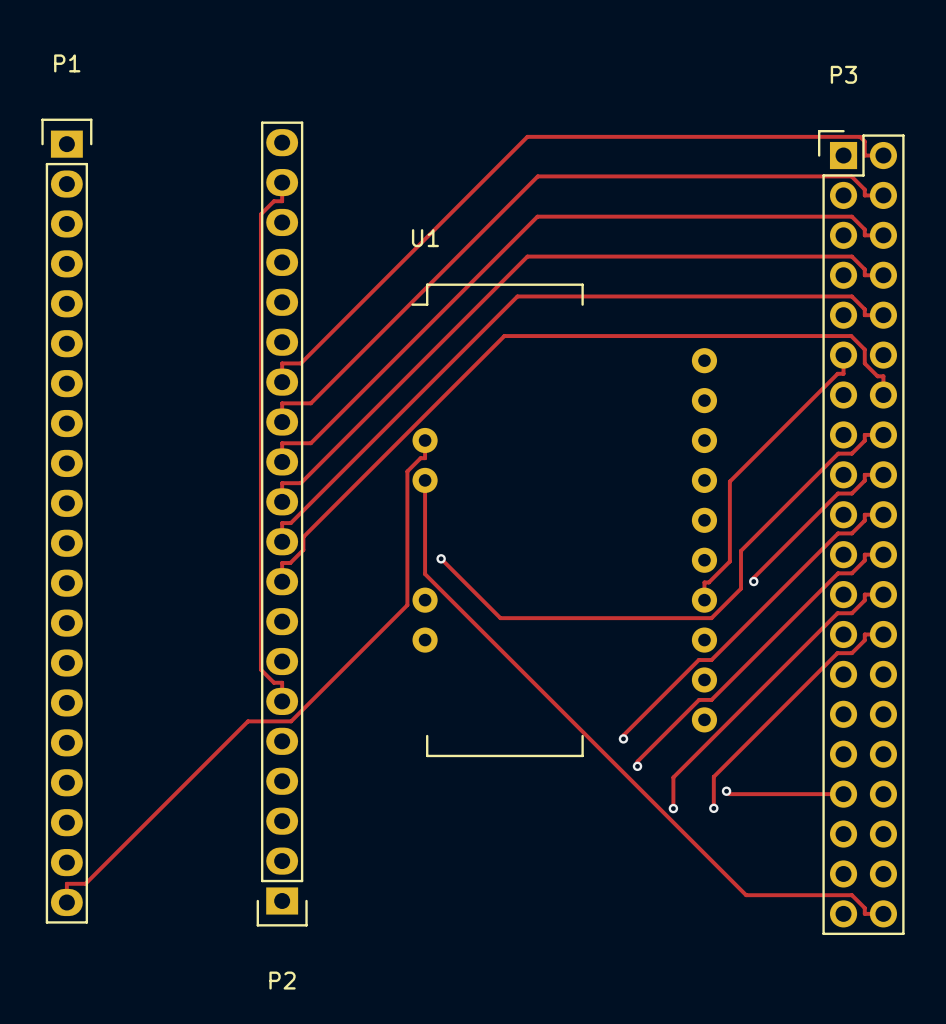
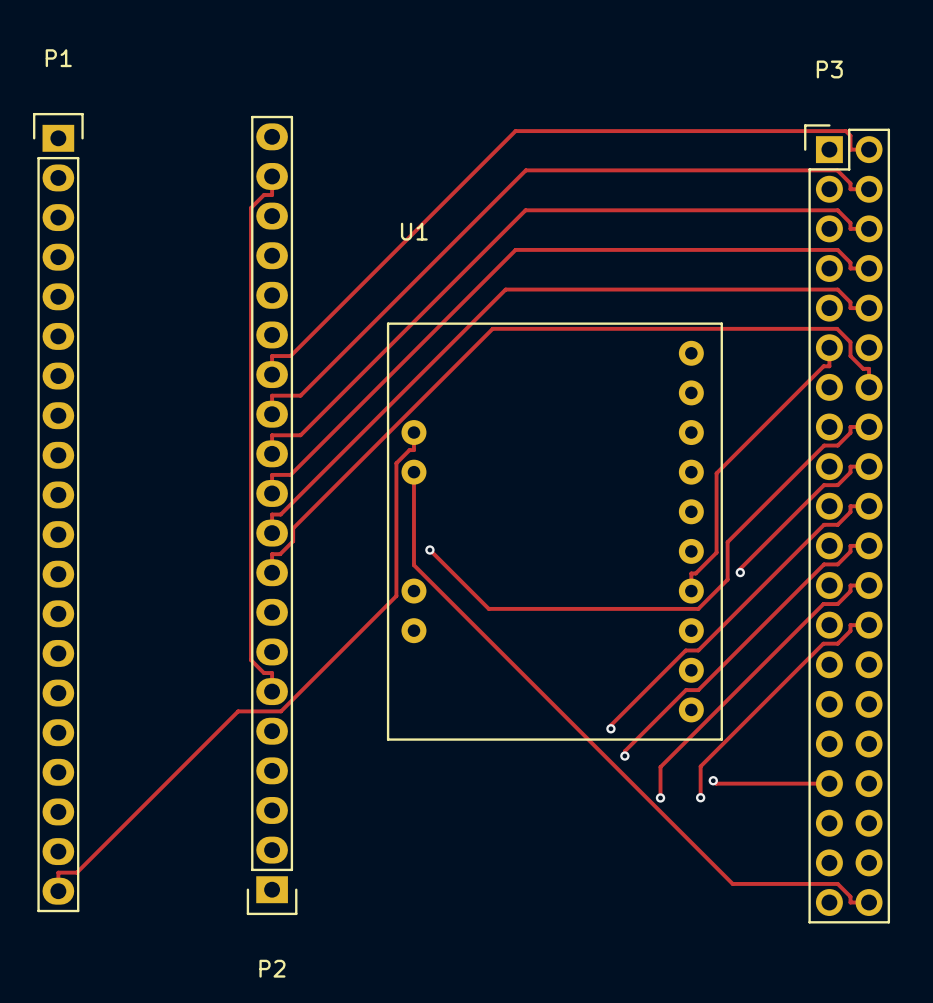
U1 footprint: [411, 283, 718, 758] -> [386, 322, 723, 741]

